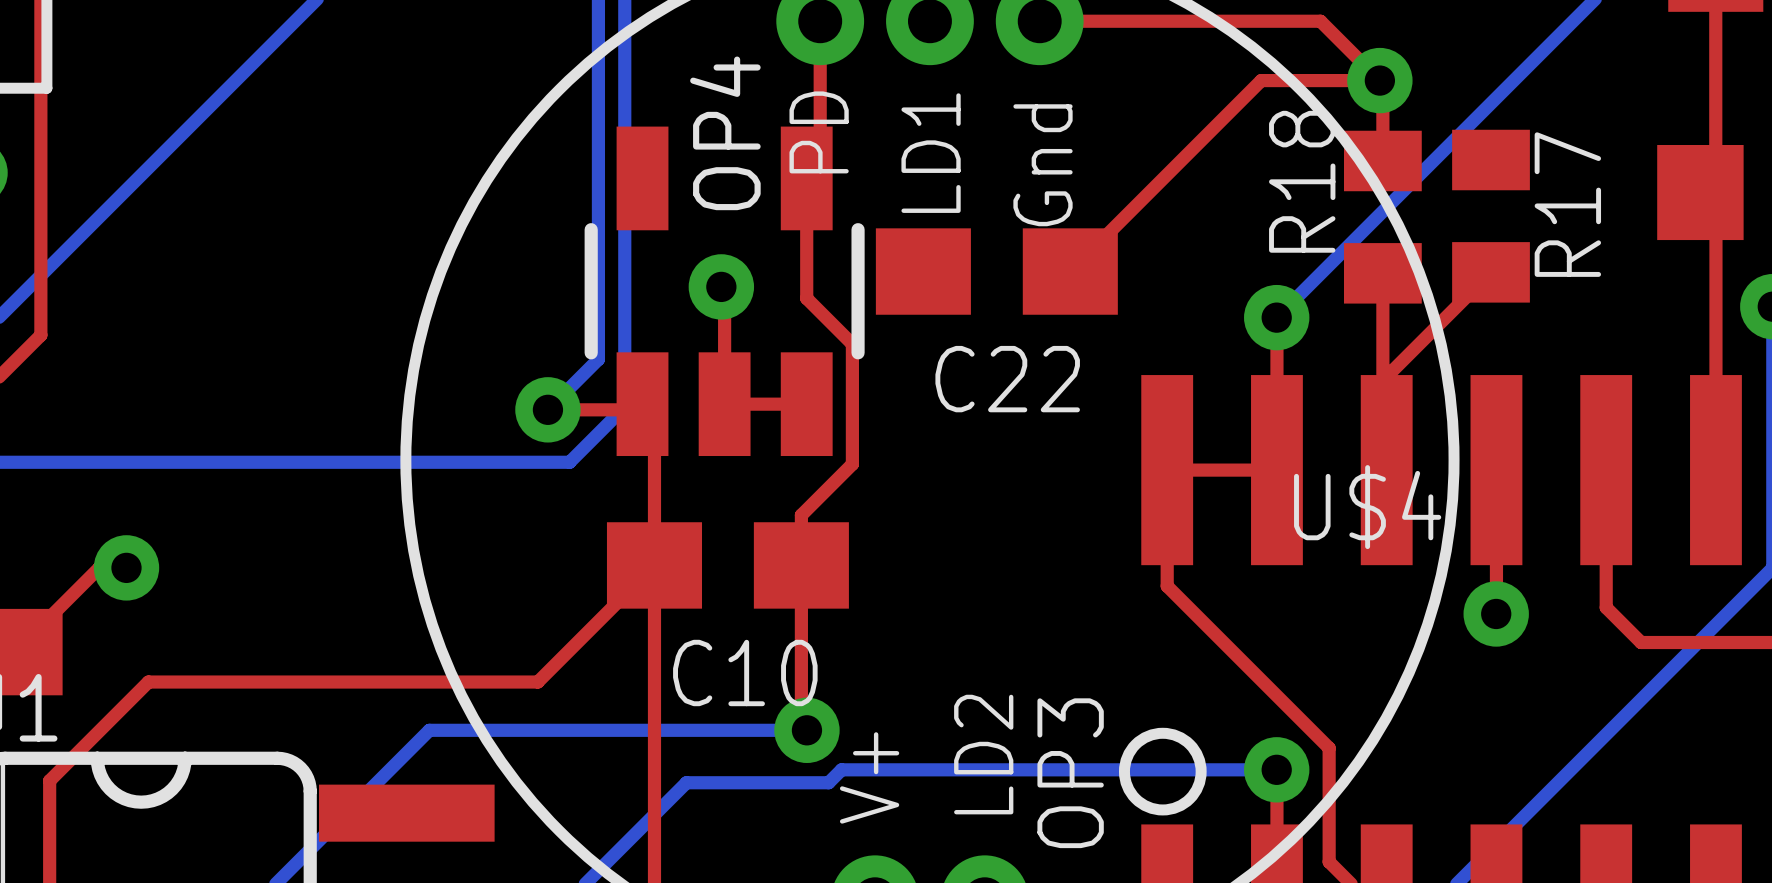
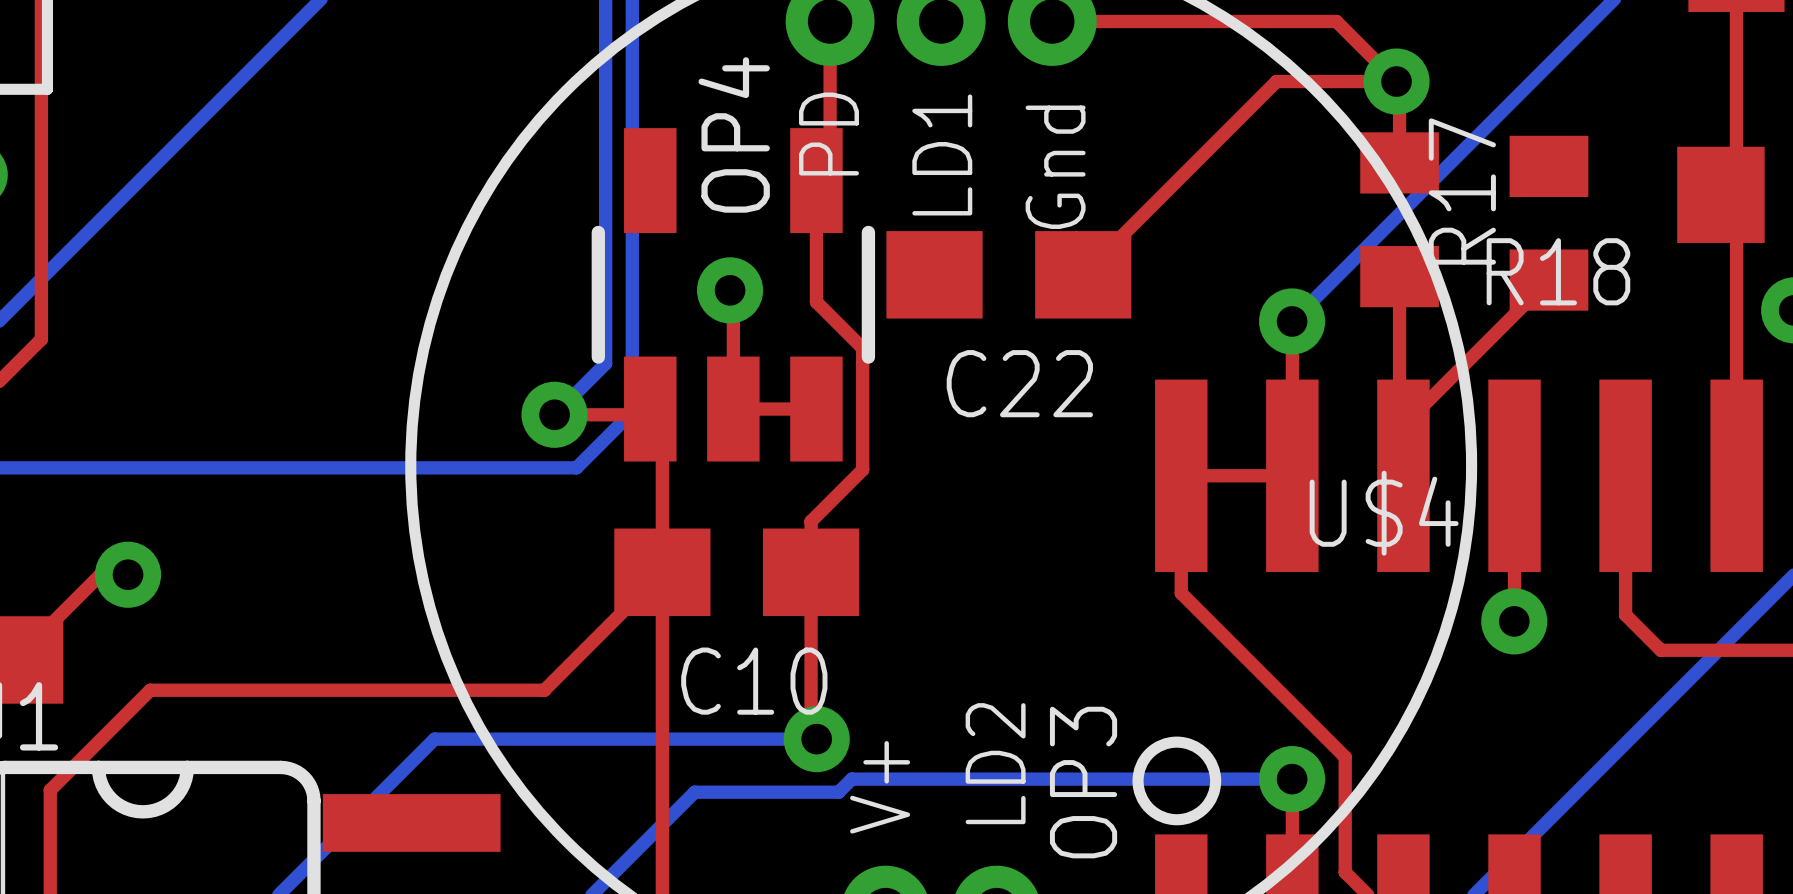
R18 name rotation: 0° (1302, 181) -> 90° clockwise (1558, 271)
R18 name position: R18 (1302, 181) -> R18 (1558, 271)
R17 name position: R17 (1567, 204) -> R17 (1462, 191)
R17 position: (1491, 216) -> (1548, 223)
top track: (1491, 272) (1386, 376) (1386, 420) -> (1548, 280) (1403, 425)

